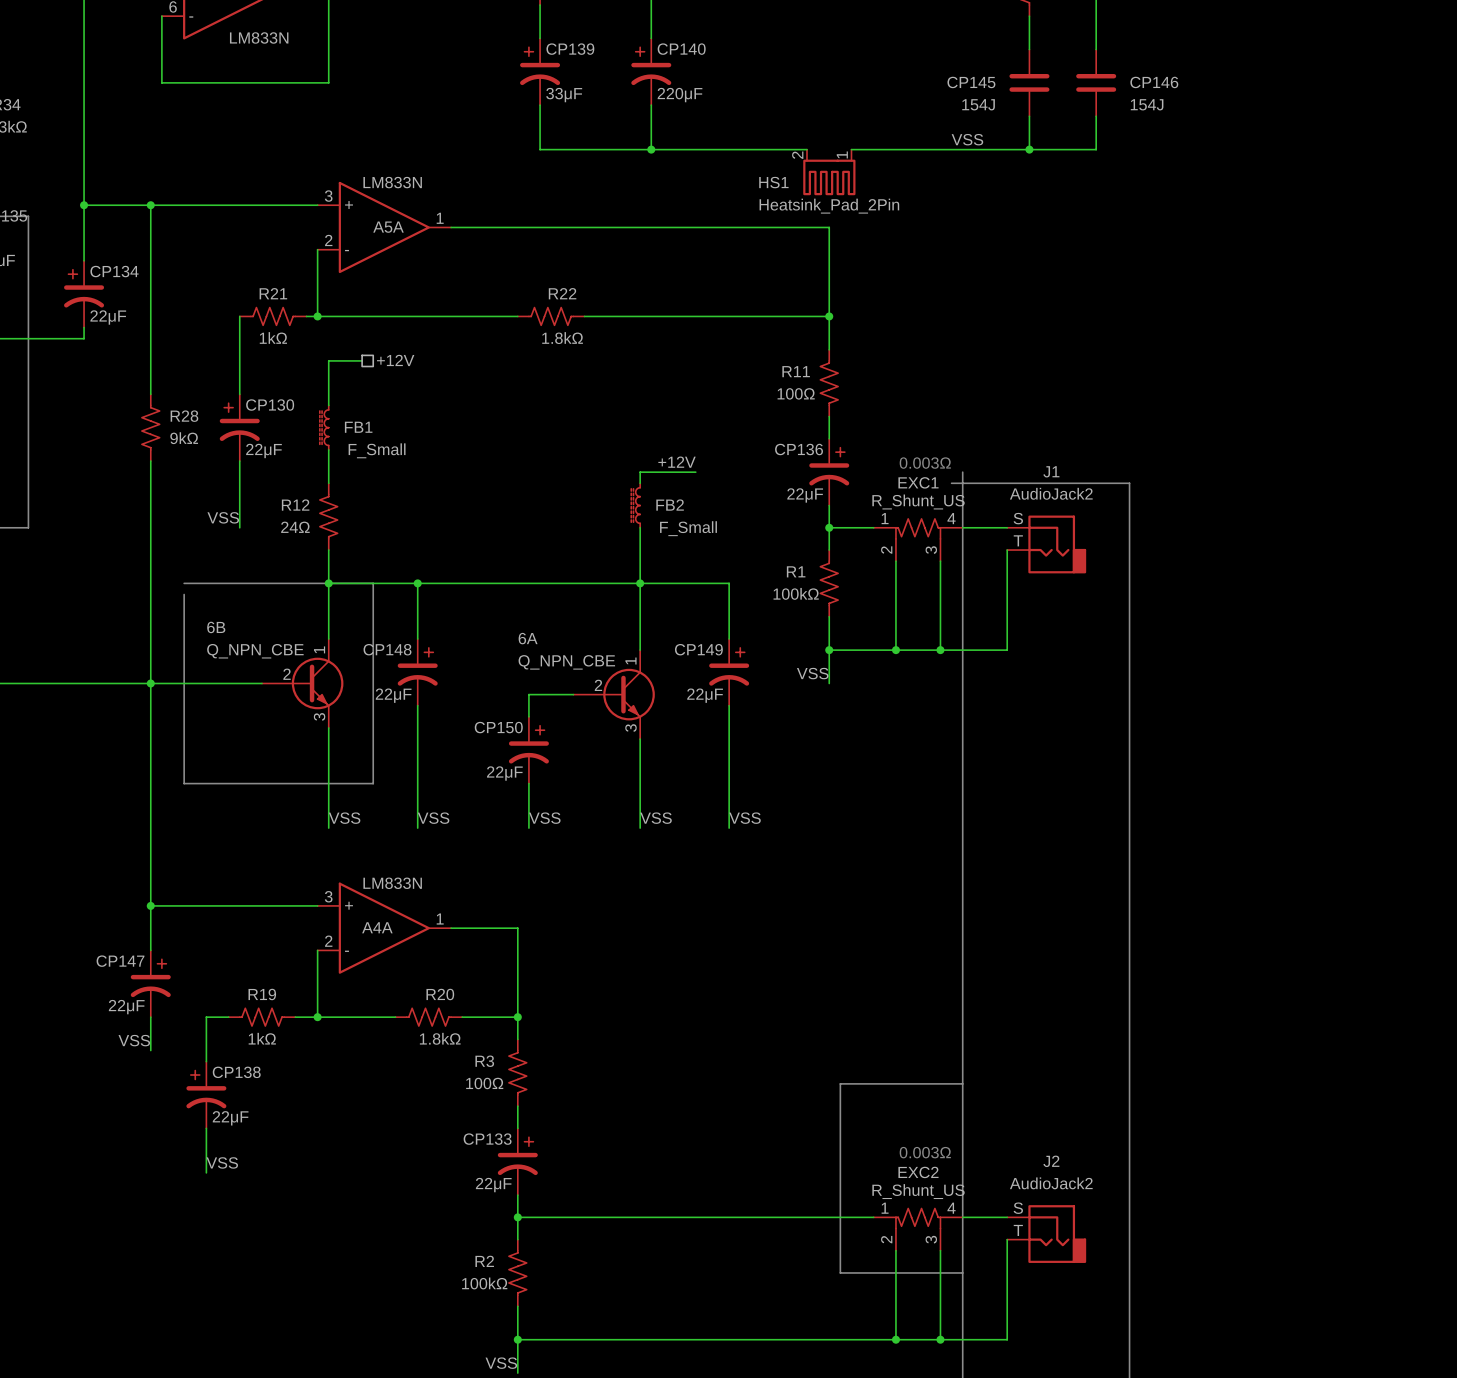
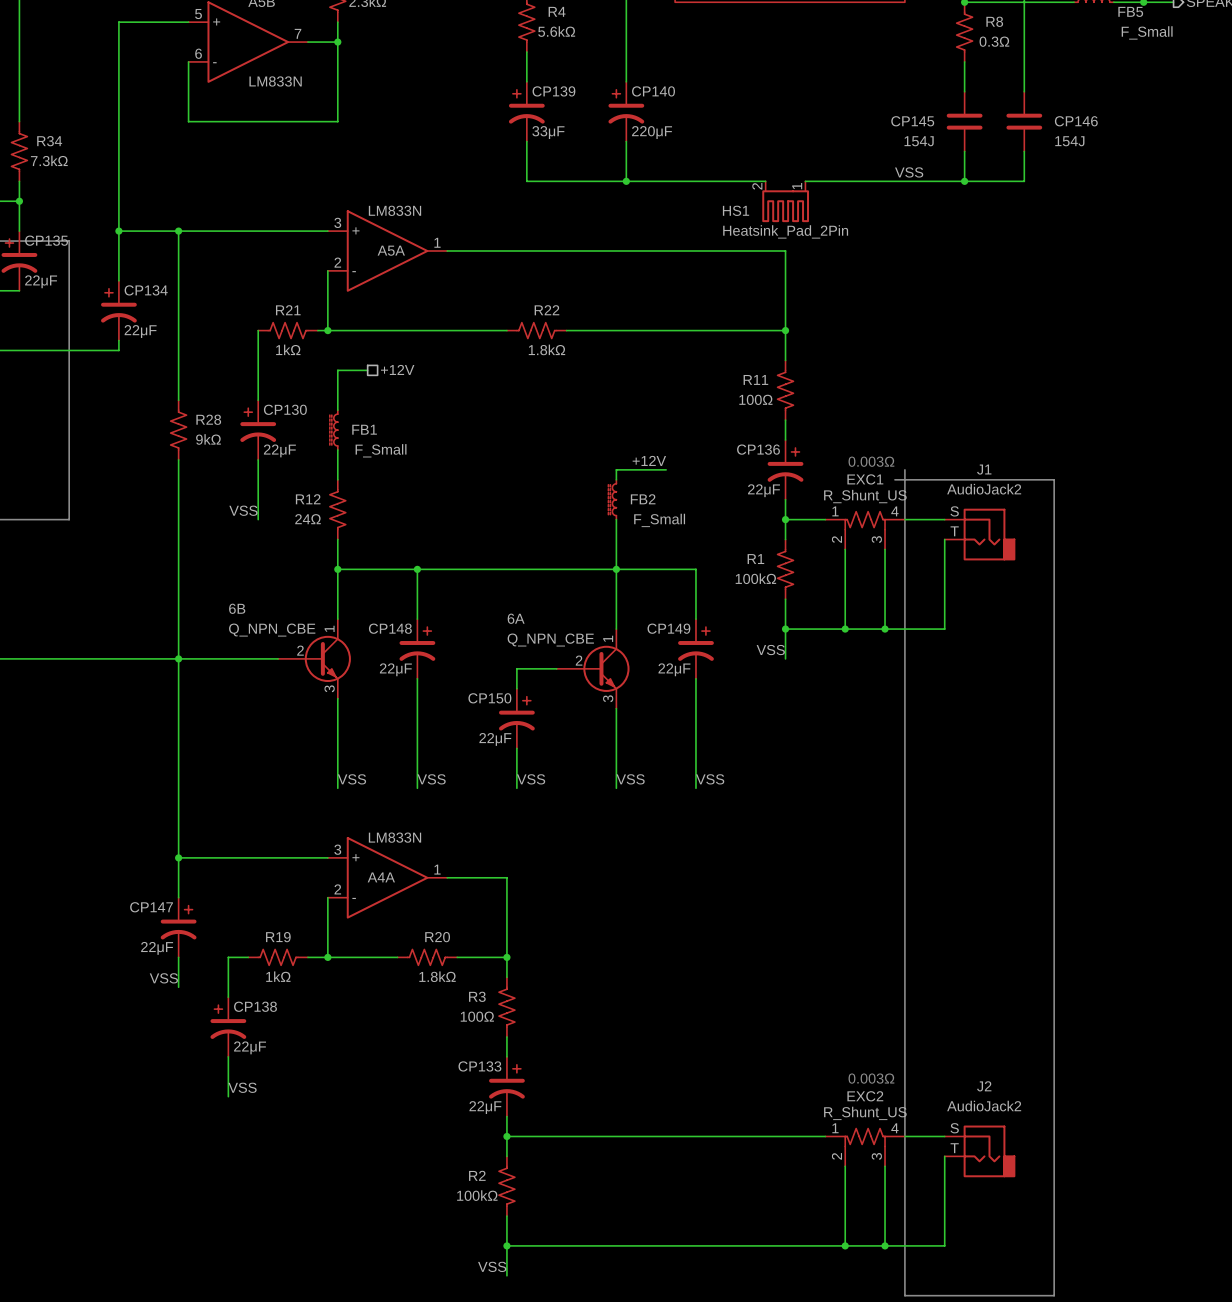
line: (184, 583) (373, 583) (373, 783) (184, 783) (184, 594) -> none
line: (962, 1083) (840, 1083) (840, 1272) (962, 1272) -> none

